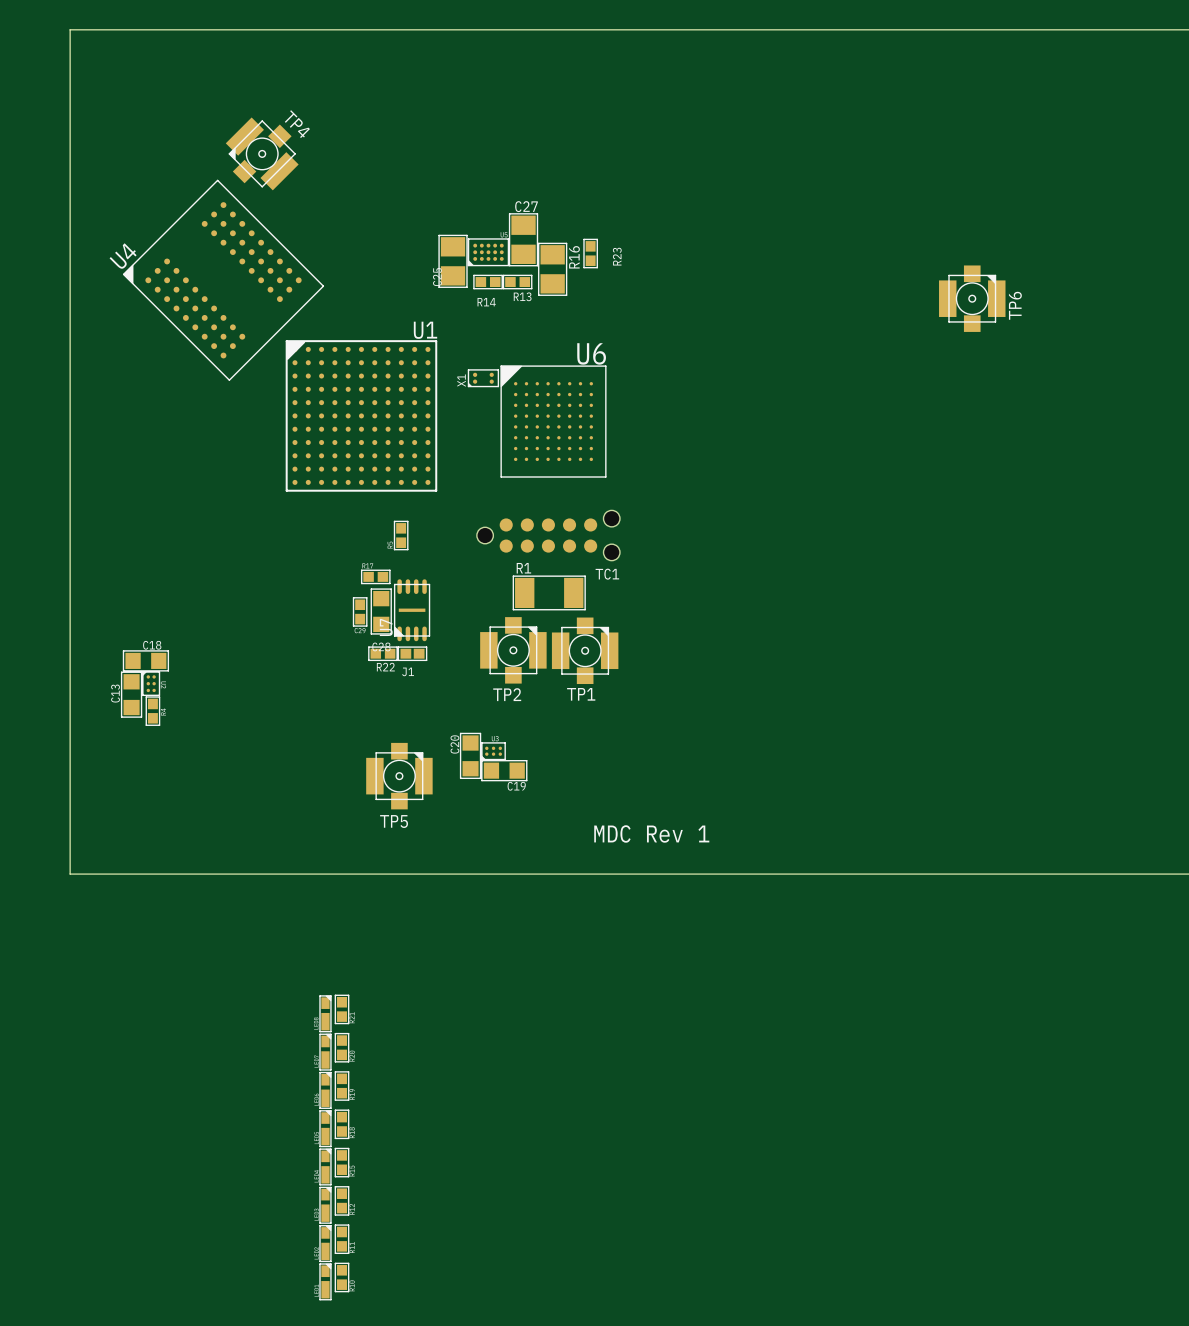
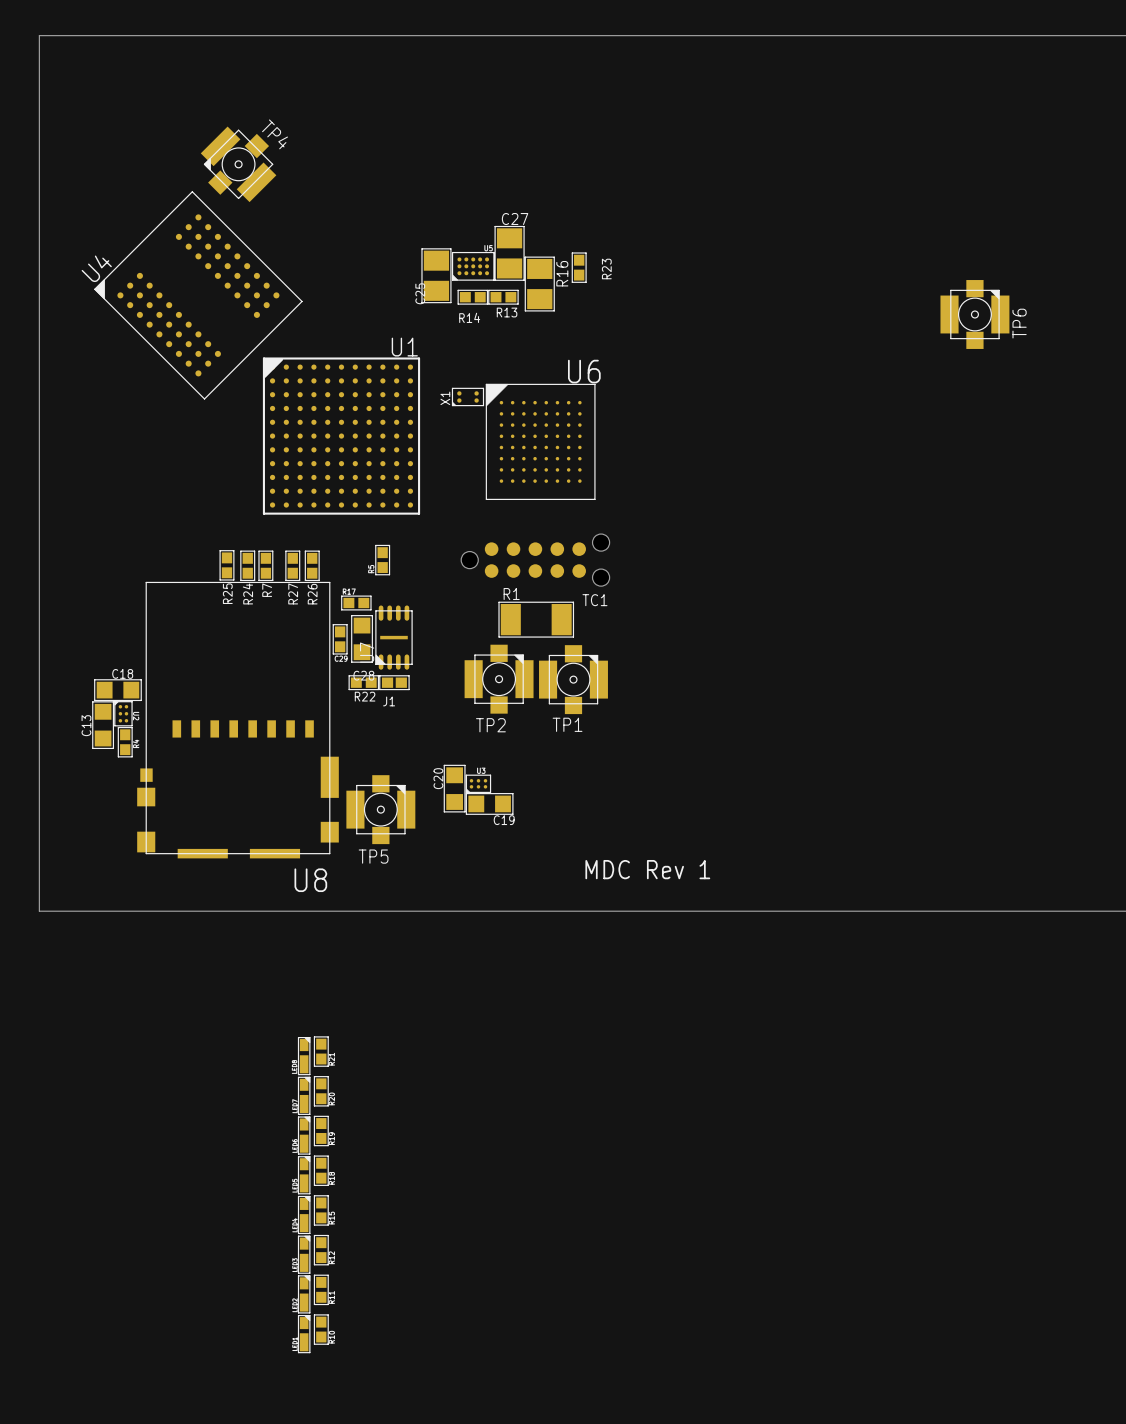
R25: none -> (226, 565)
R24: none -> (247, 565)
R7: none -> (265, 565)
R27: none -> (292, 565)
R26: none -> (312, 565)
U8: none -> (238, 720)

